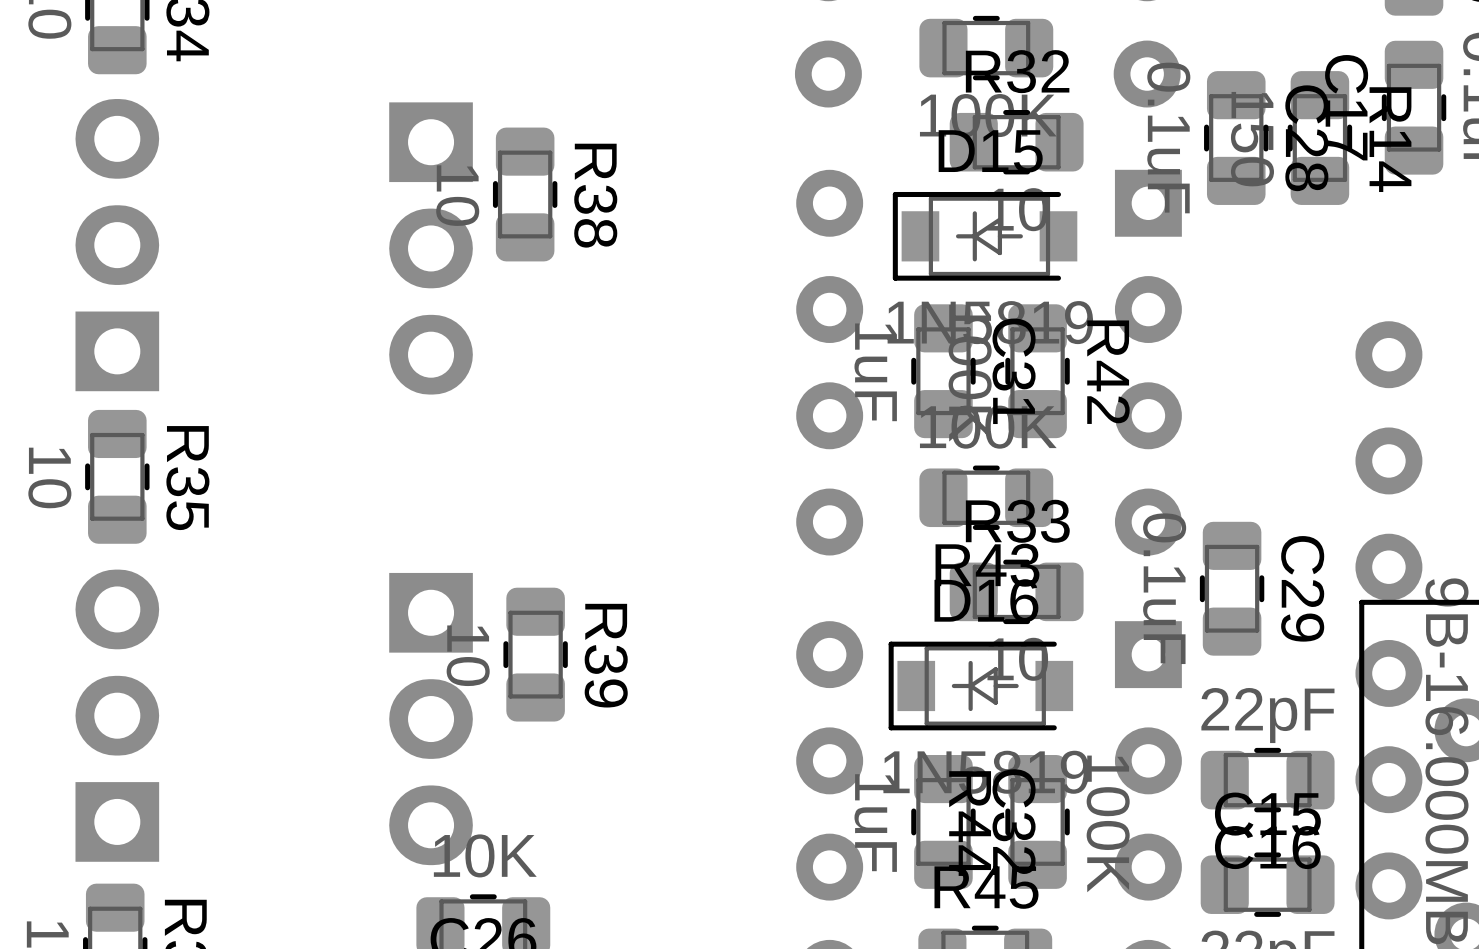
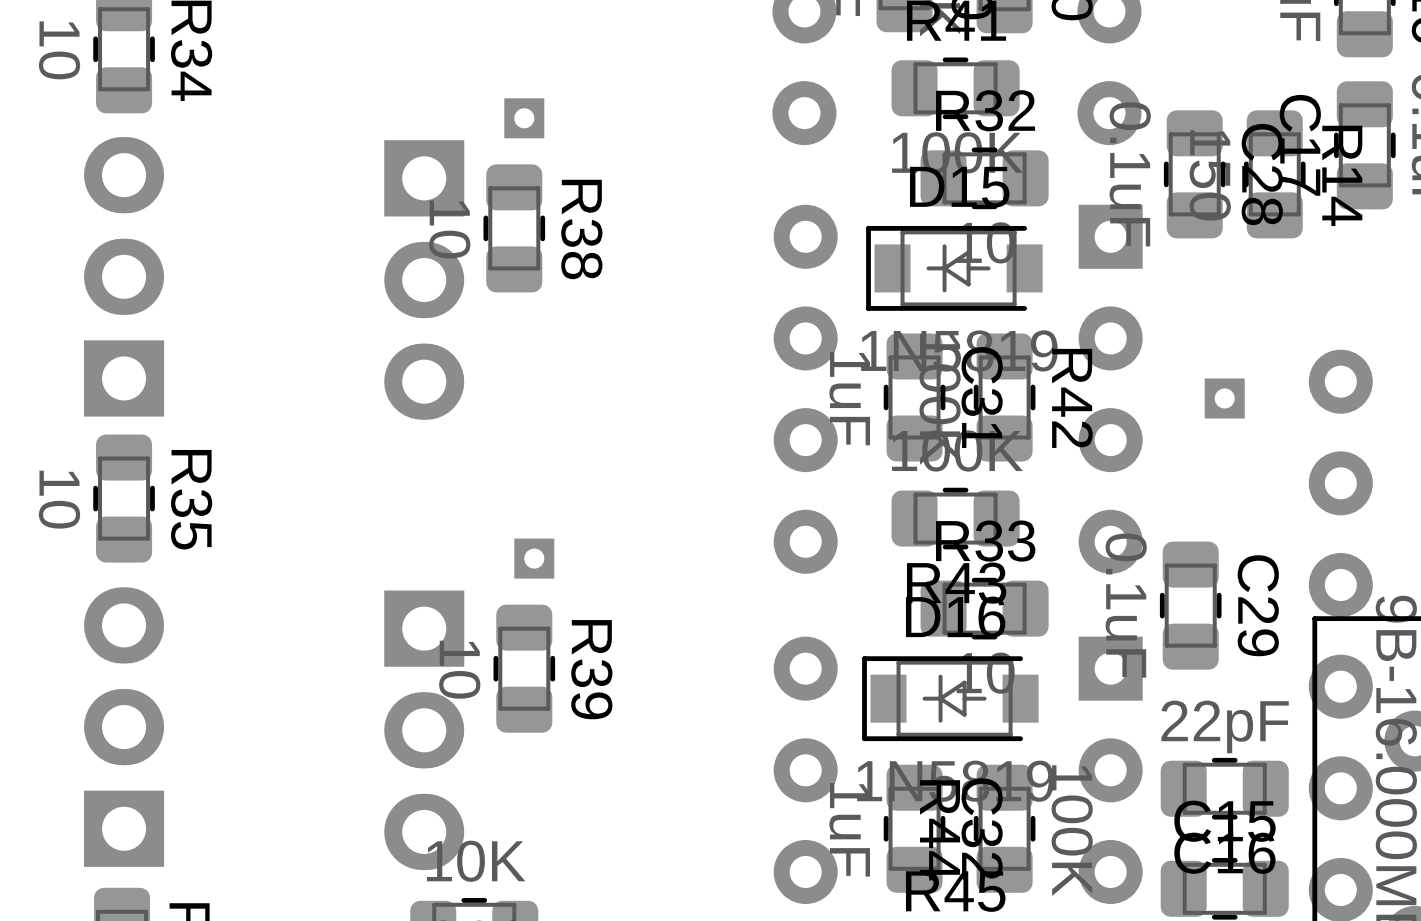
part: none -> (524, 118)
part: none -> (1224, 398)
part: none -> (534, 558)

